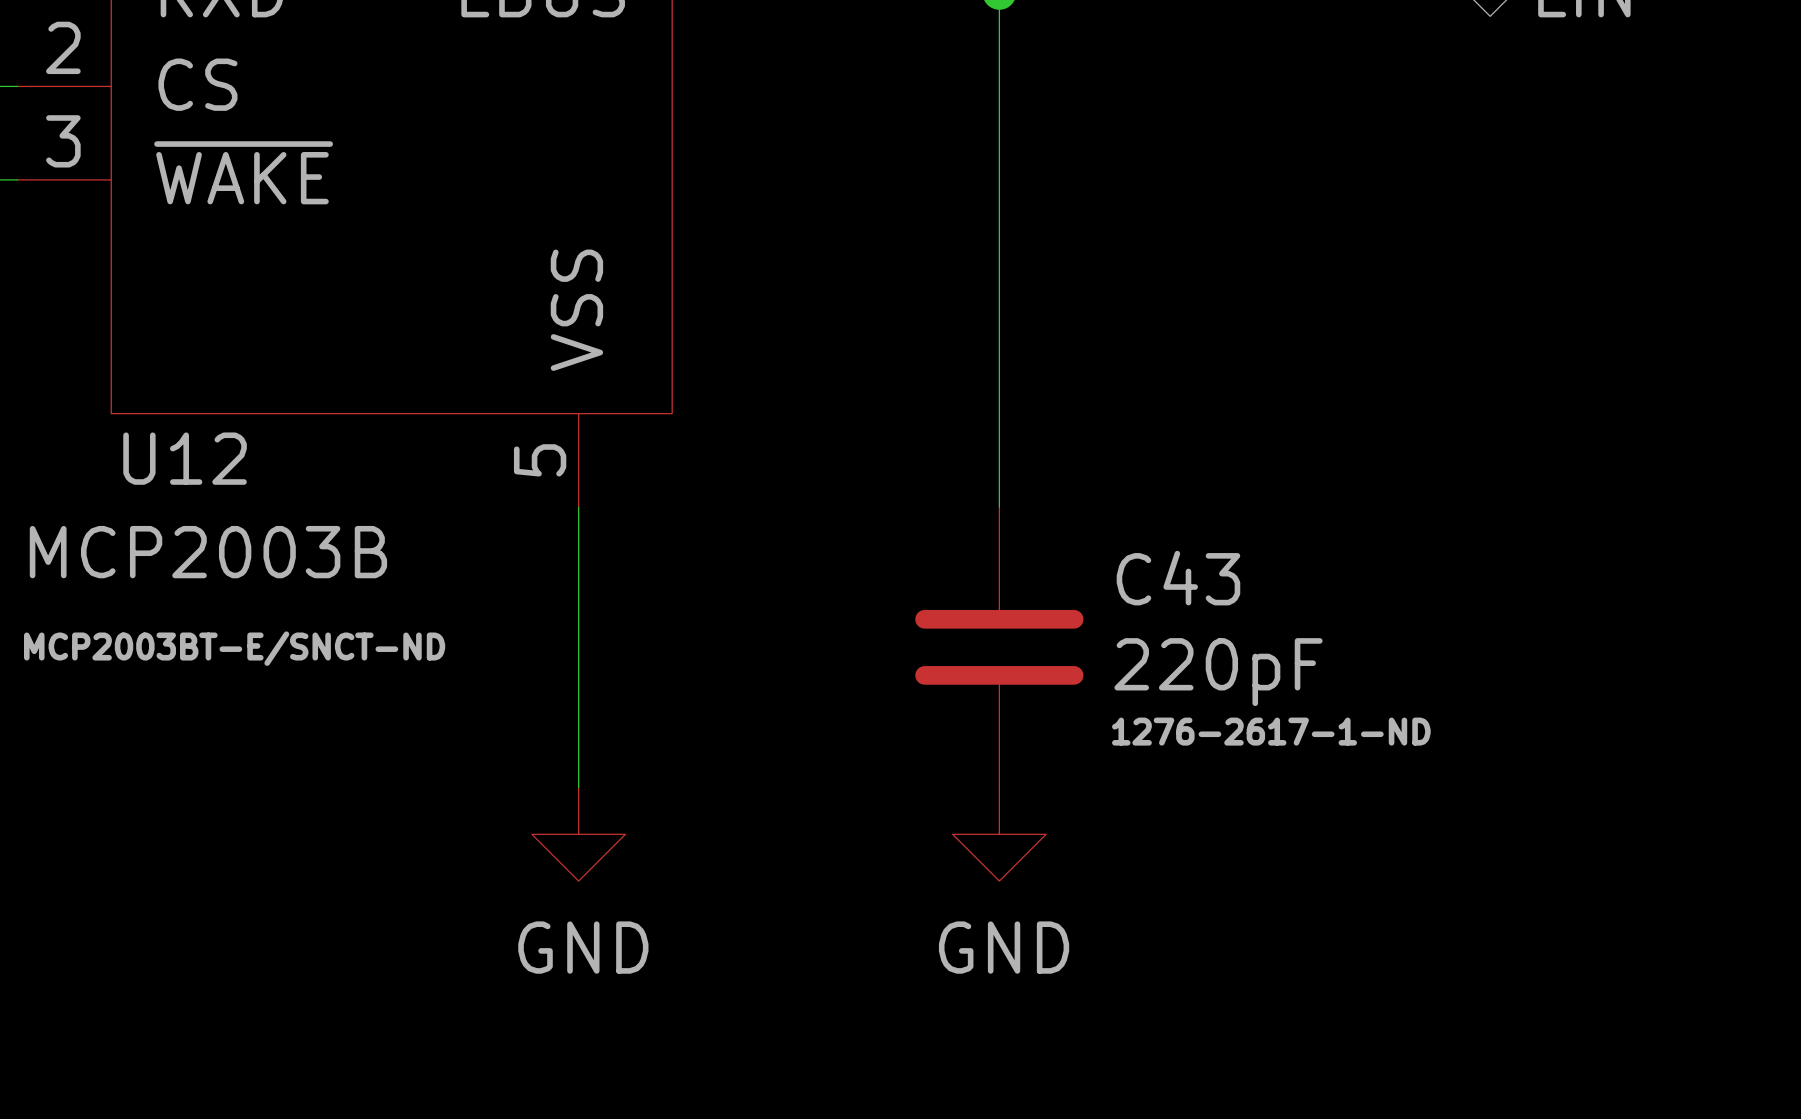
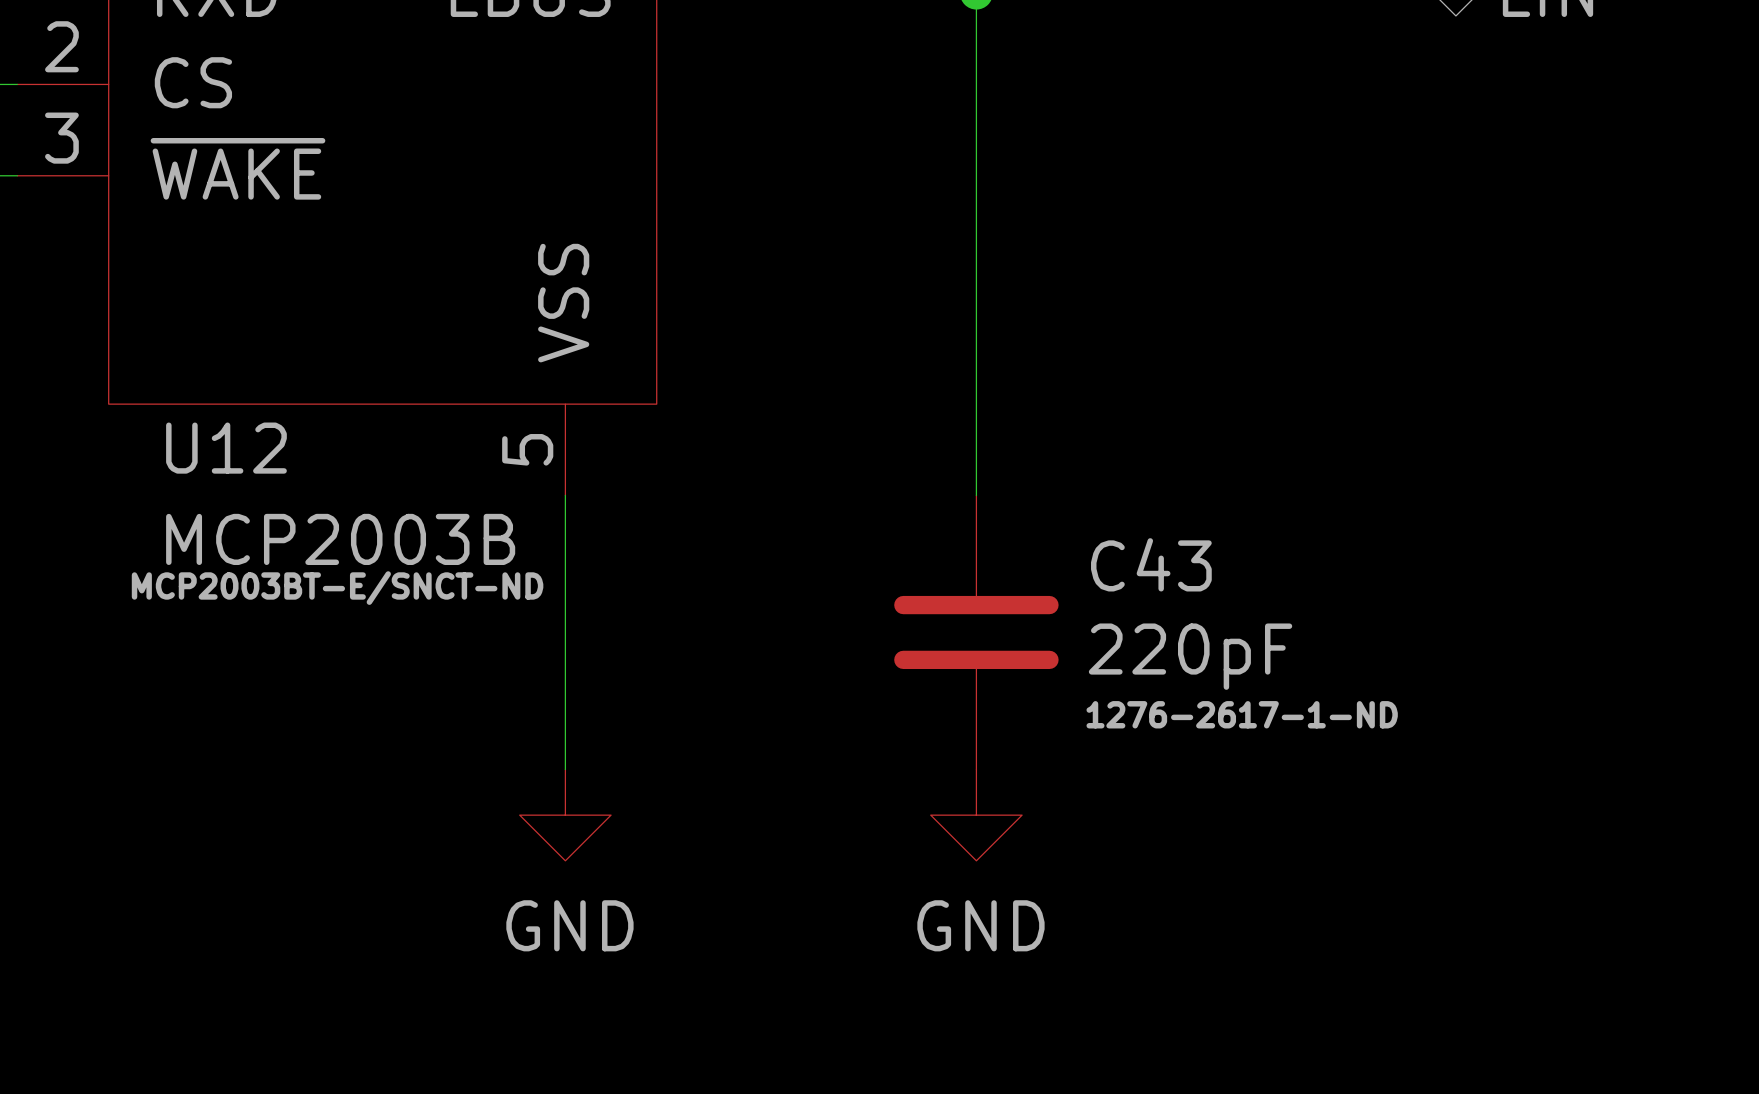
U12 name position: U12 (185, 458) -> U12 (226, 448)
U12 value position: MCP2003B (208, 552) -> MCP2003B (340, 539)
U12 text position: MCP2003BT-E/SNCT-ND (234, 648) -> MCP2003BT-E/SNCT-ND (337, 588)

